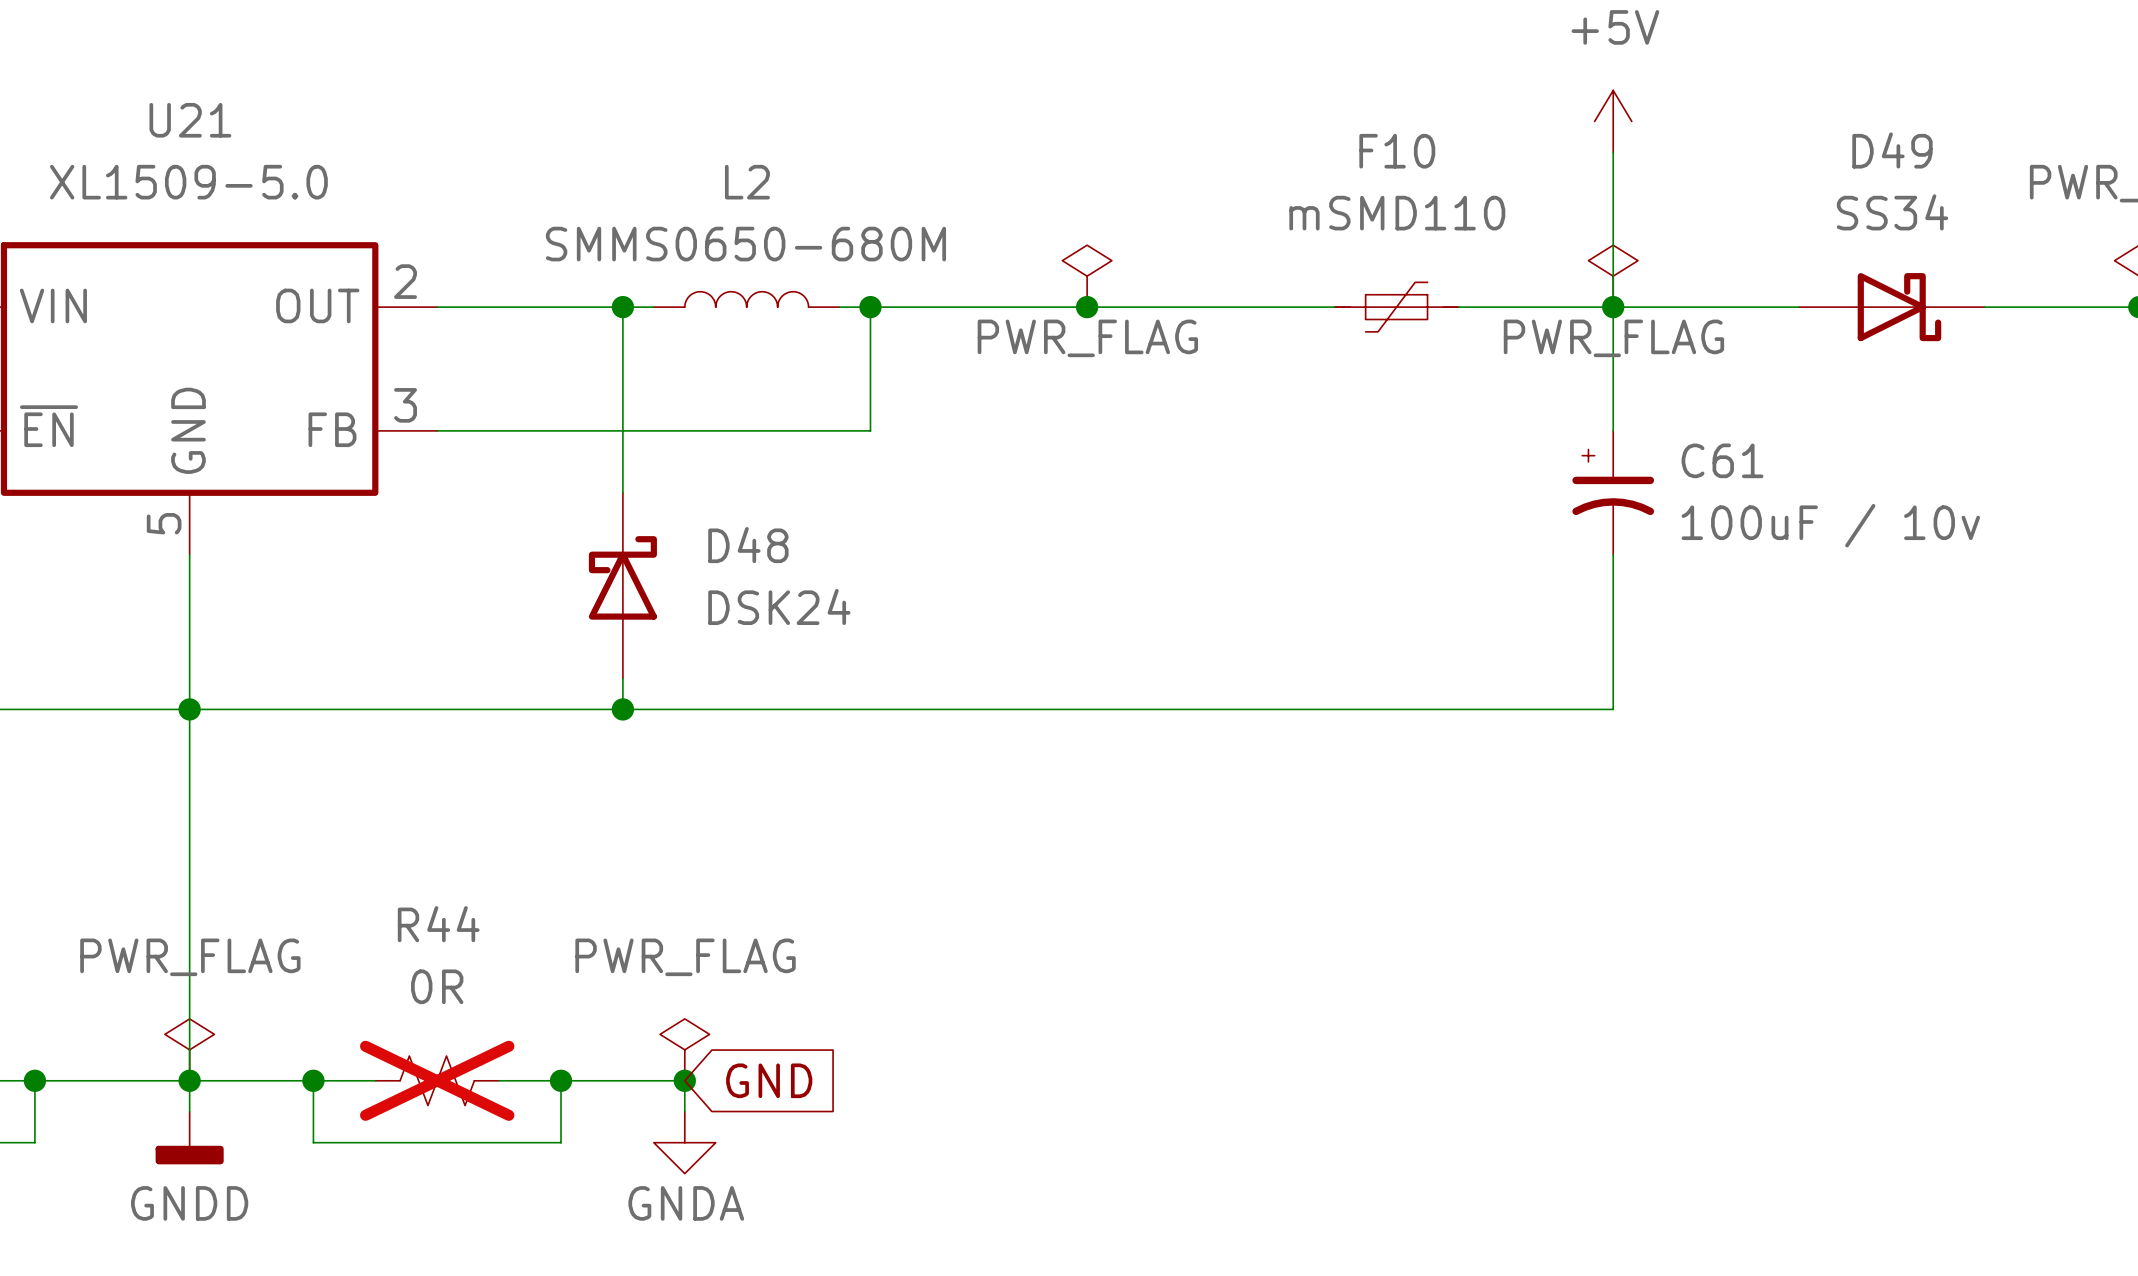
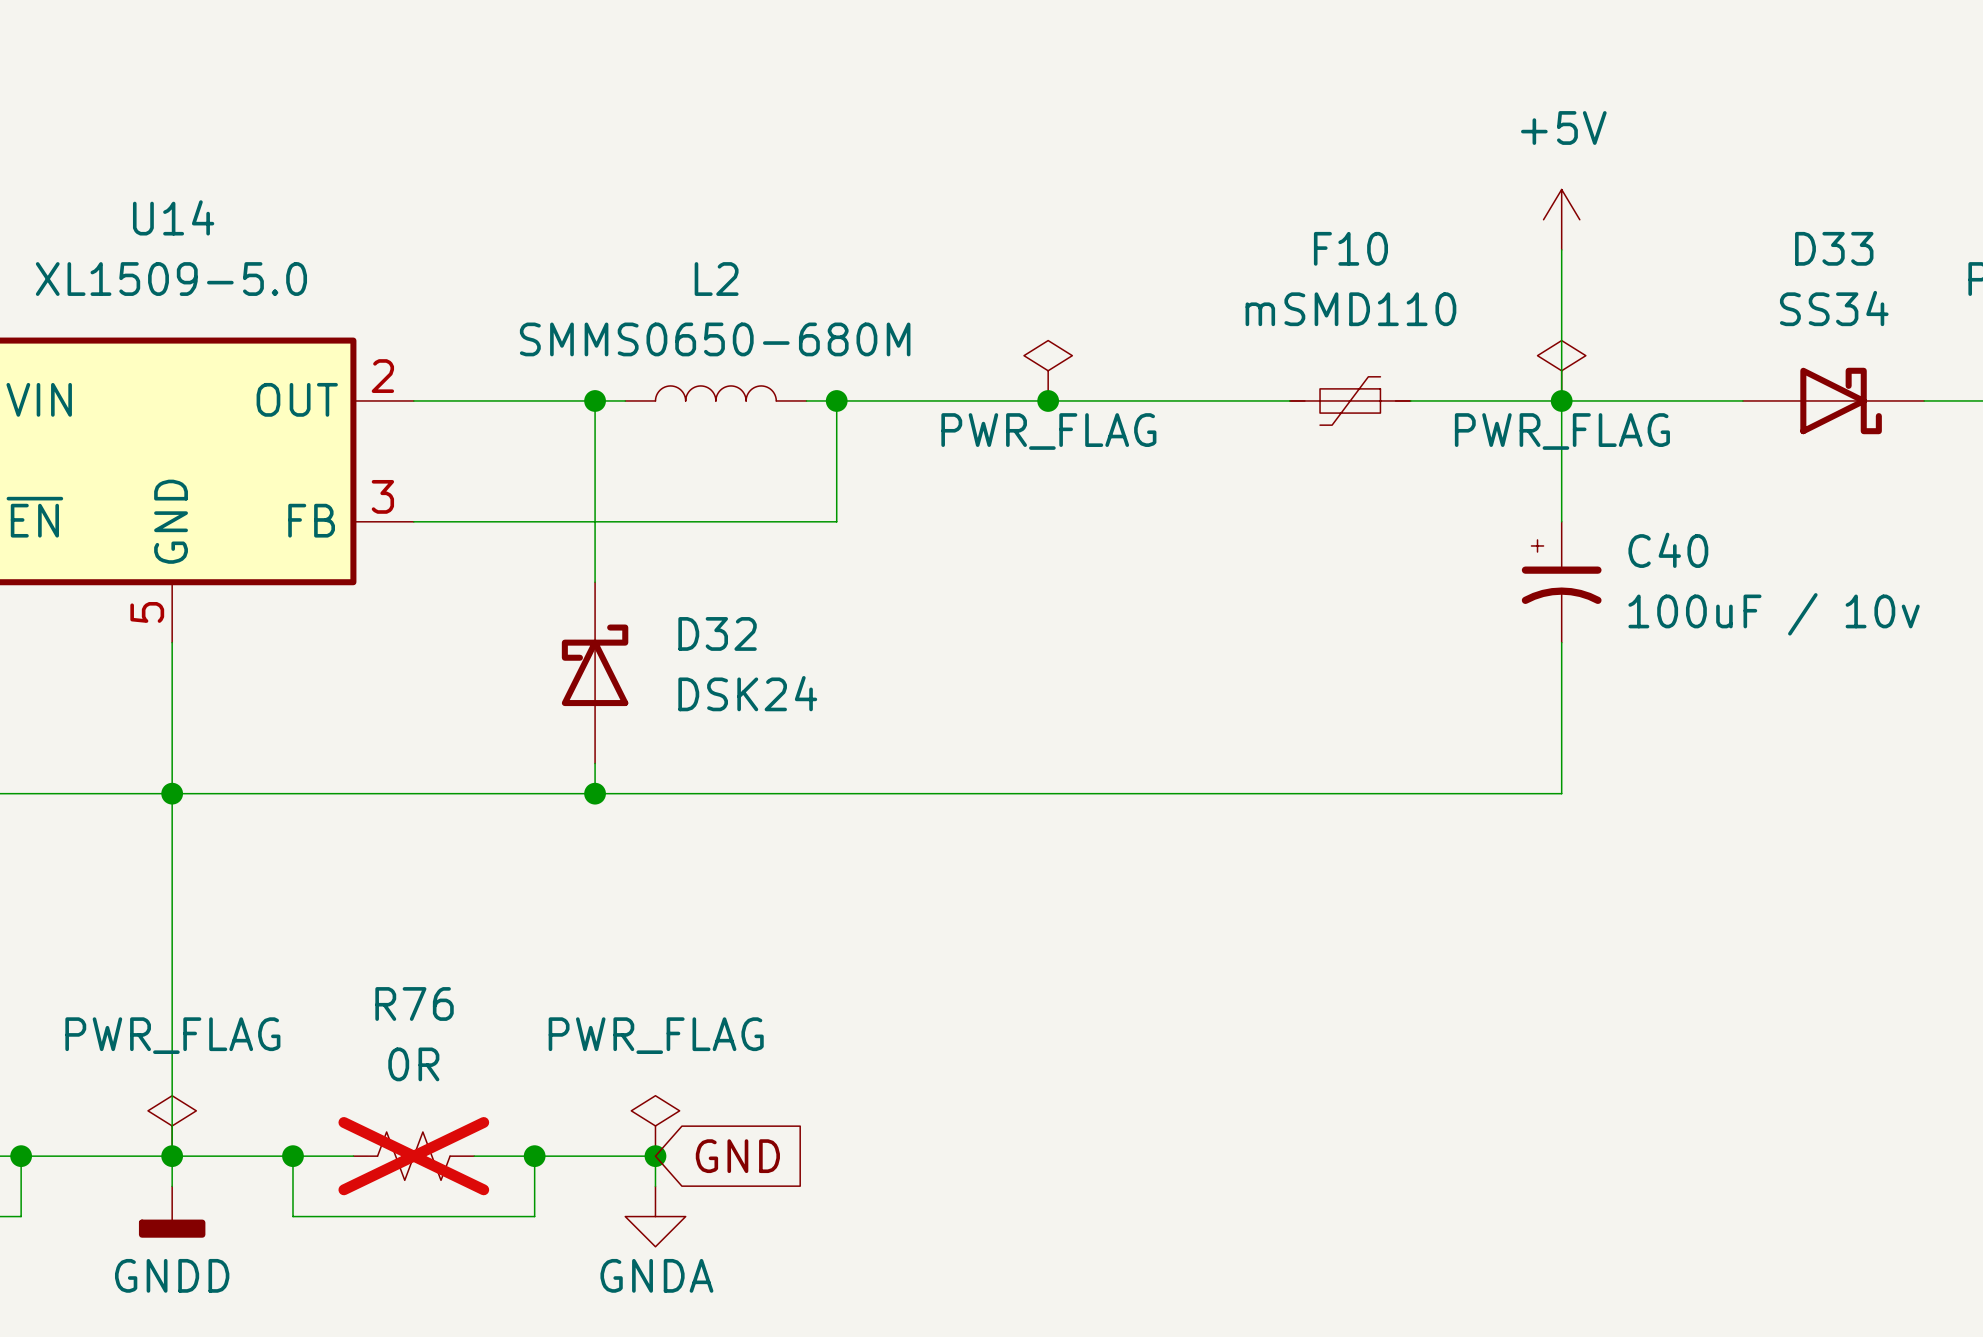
U21 name: U21 (190, 120) -> U14 (173, 217)
D49 name: D49 (1892, 150) -> D33 (1834, 248)
C61 name: C61 (1722, 460) -> C40 (1668, 550)
D48 name: D48 (748, 545) -> D32 (717, 633)
R44 name: R44 (438, 924) -> R76 (414, 1003)

